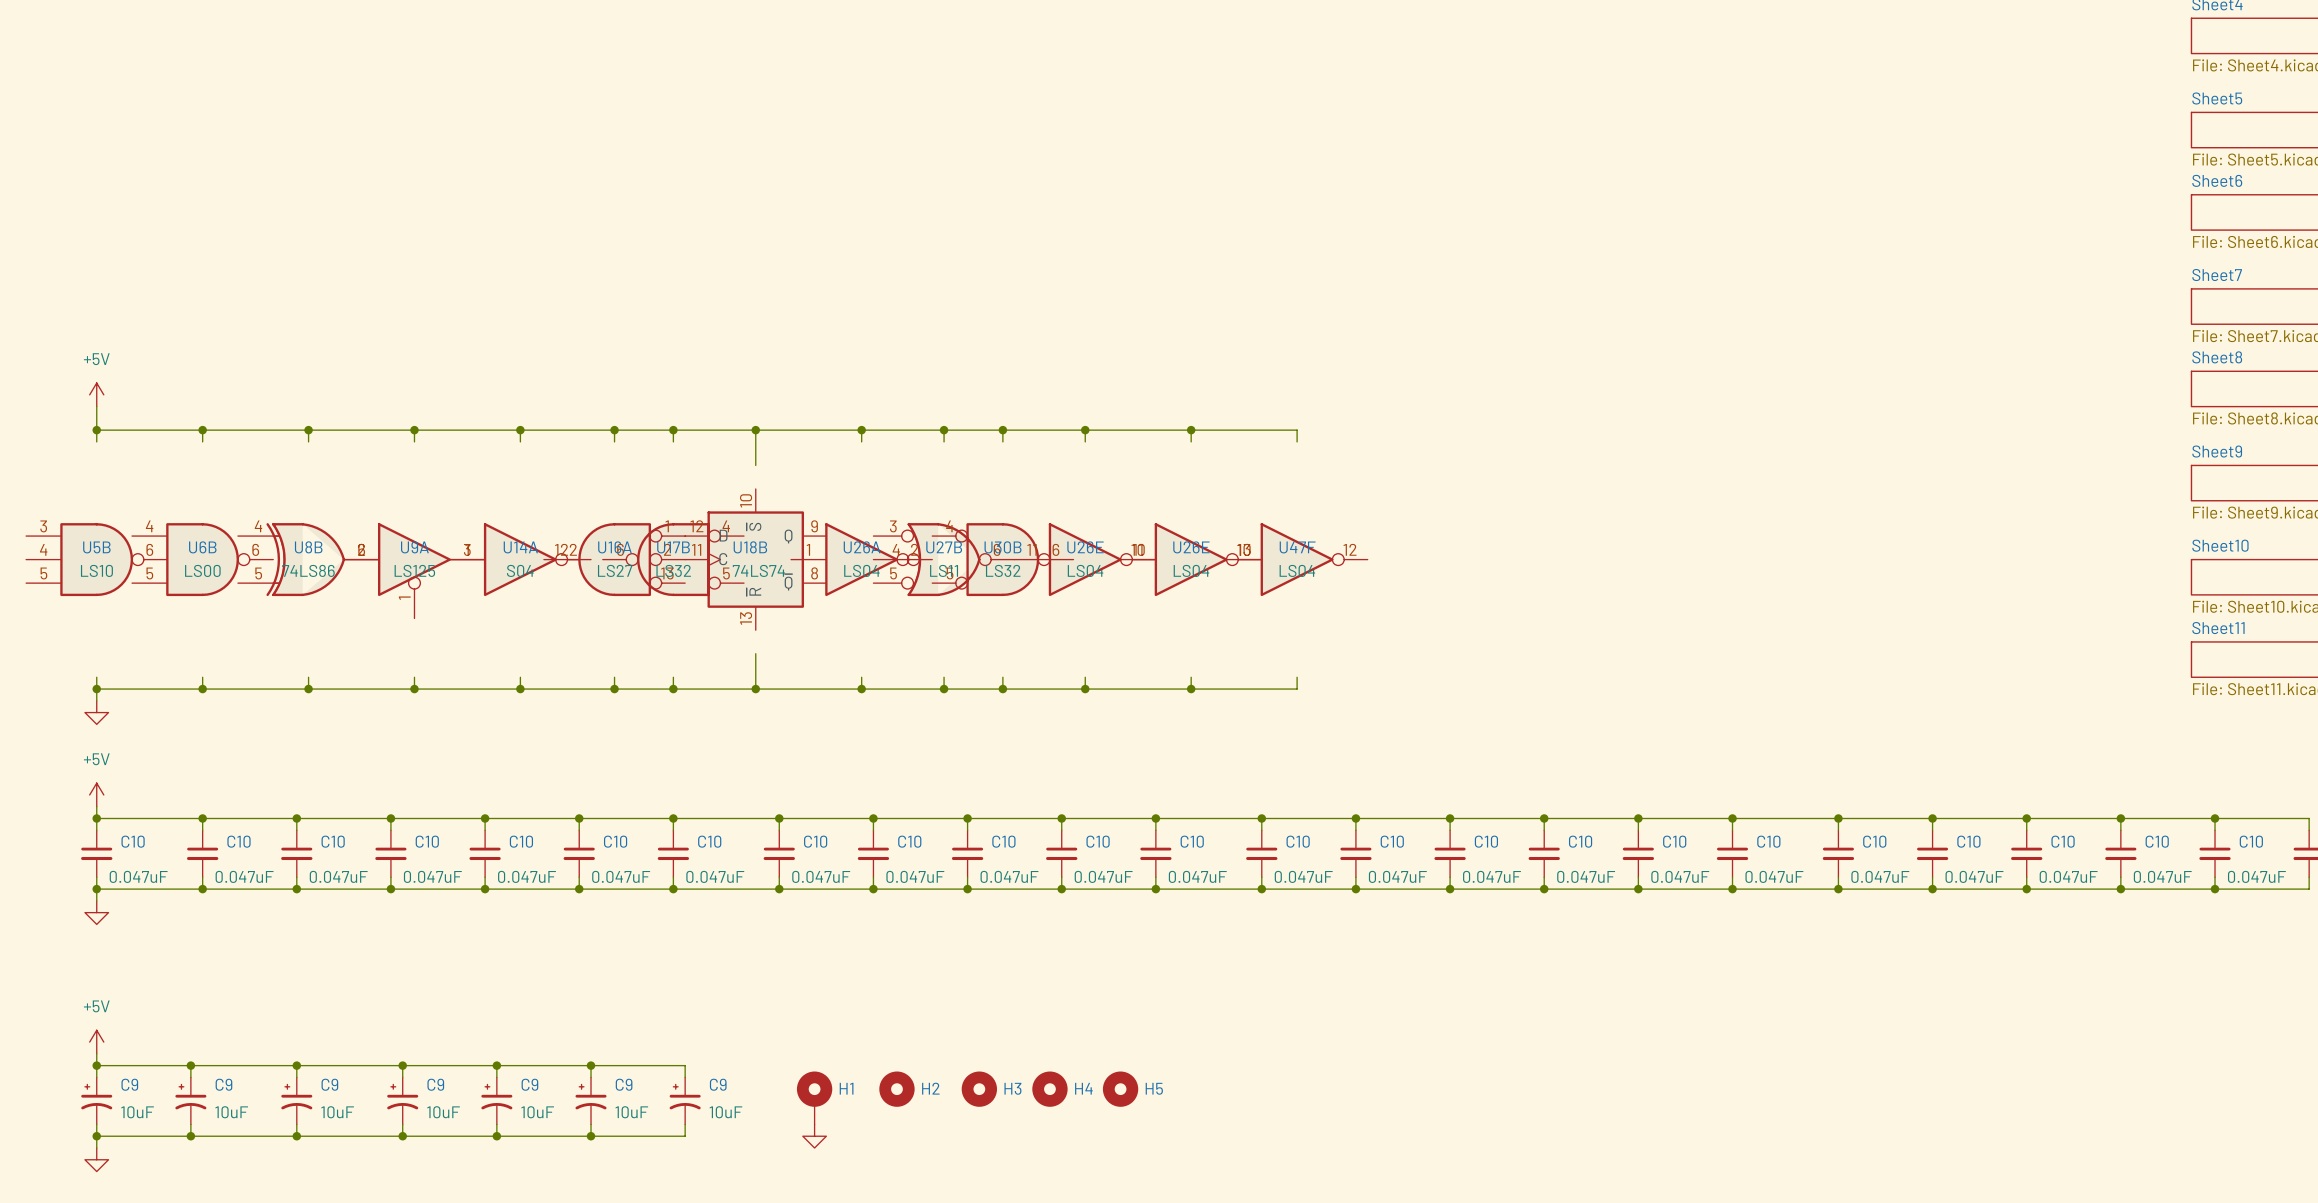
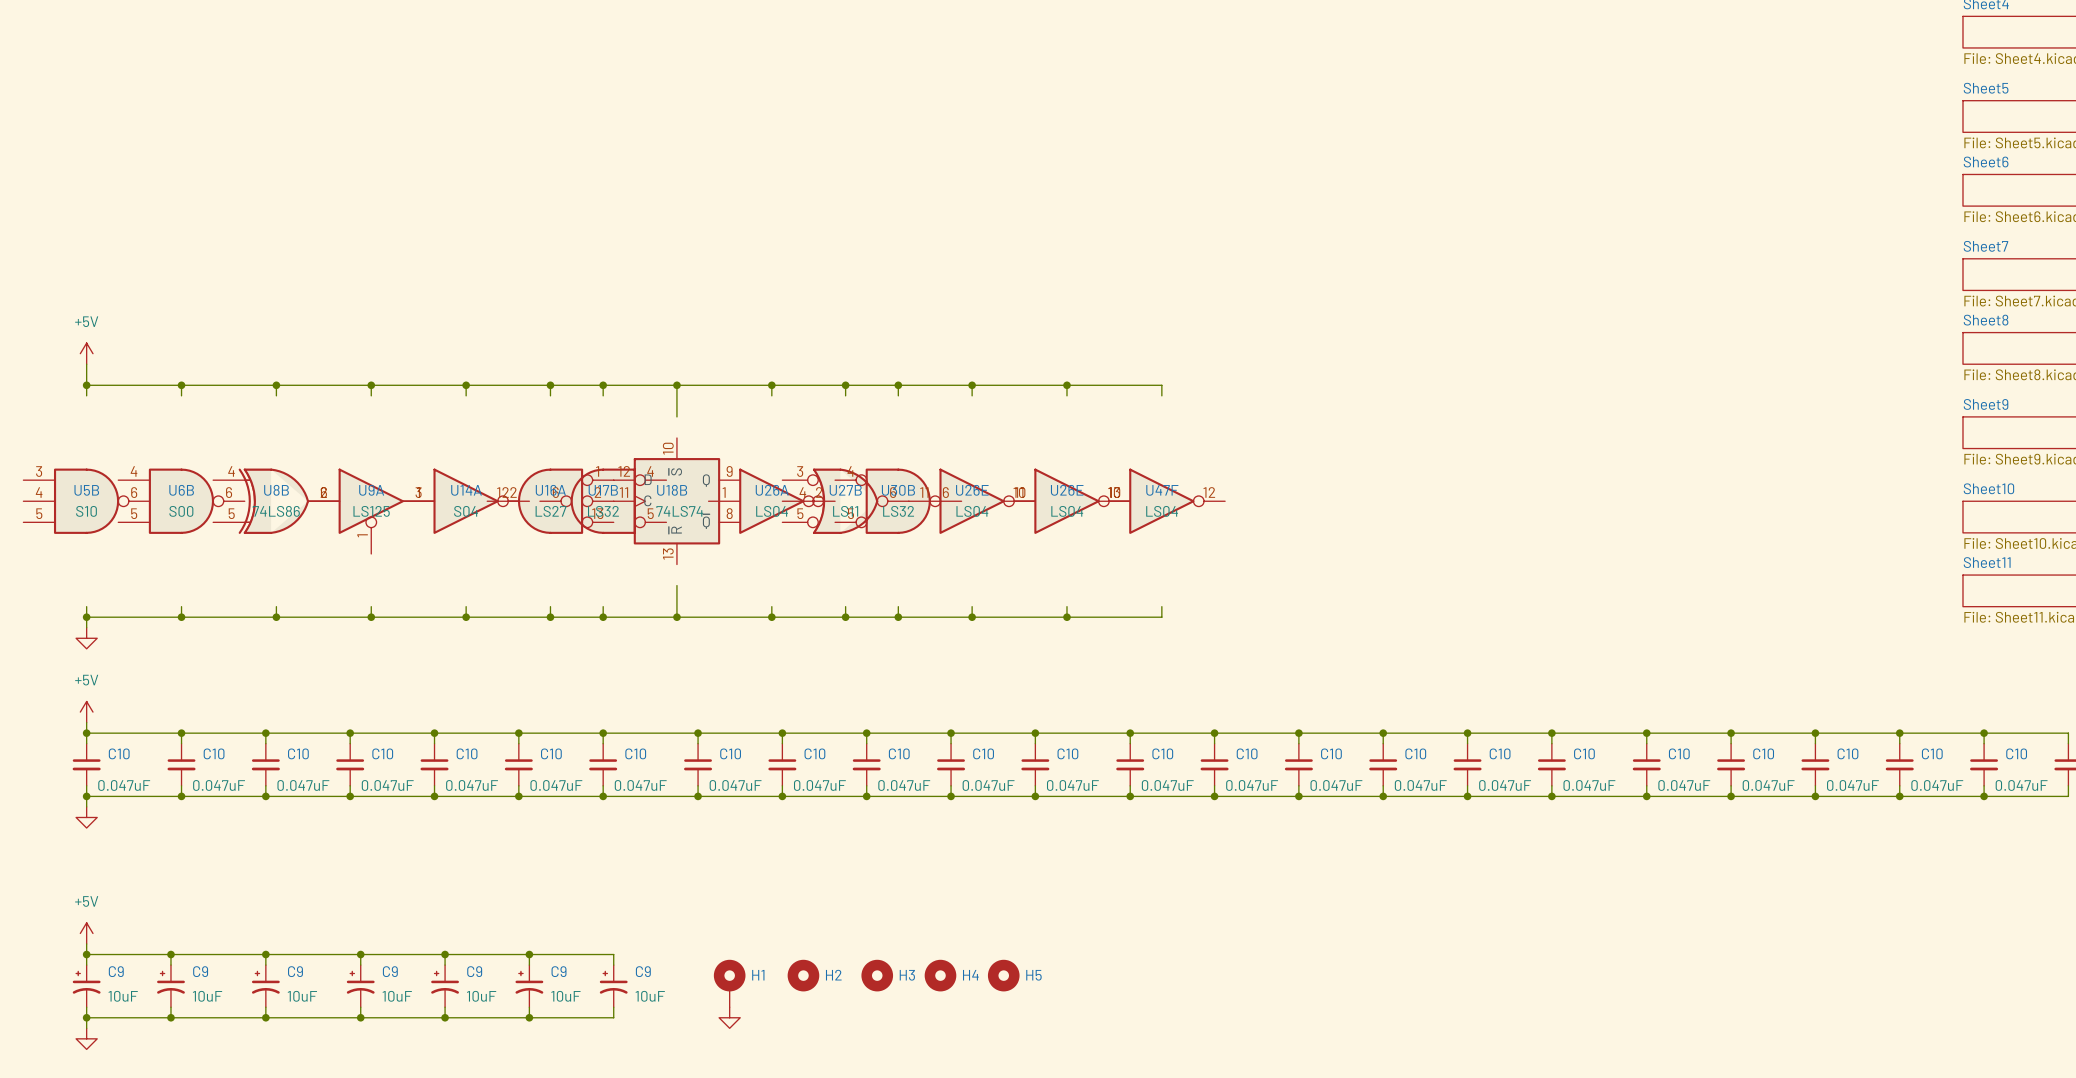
U5B value: LS10 (96, 570) -> S10 (86, 511)
U6B value: LS00 (202, 570) -> S00 (181, 511)

